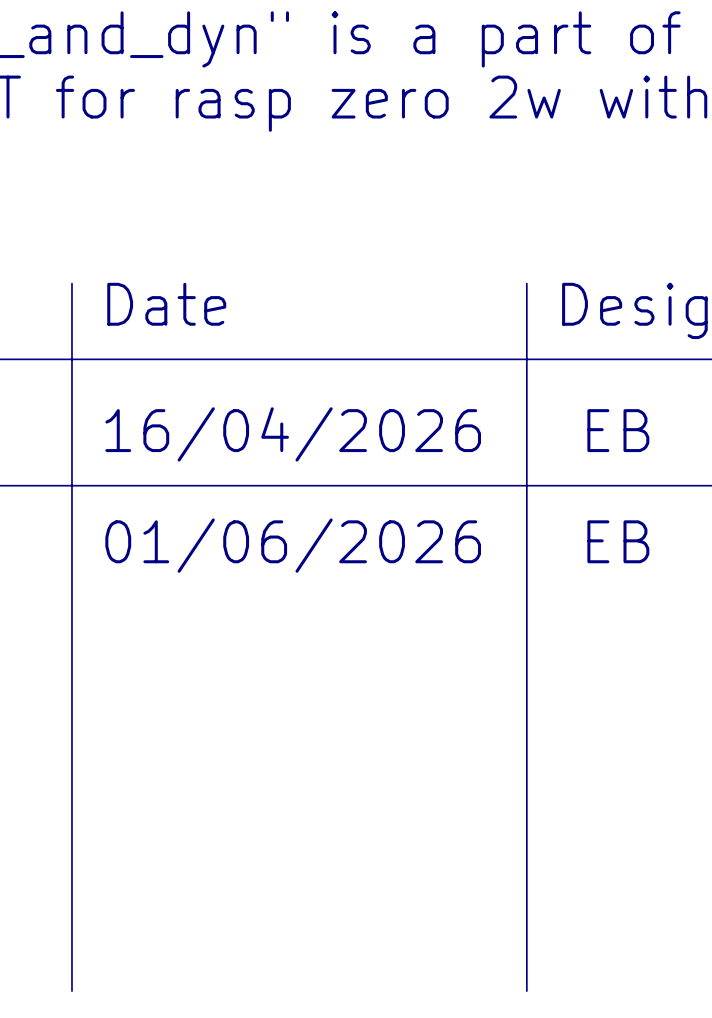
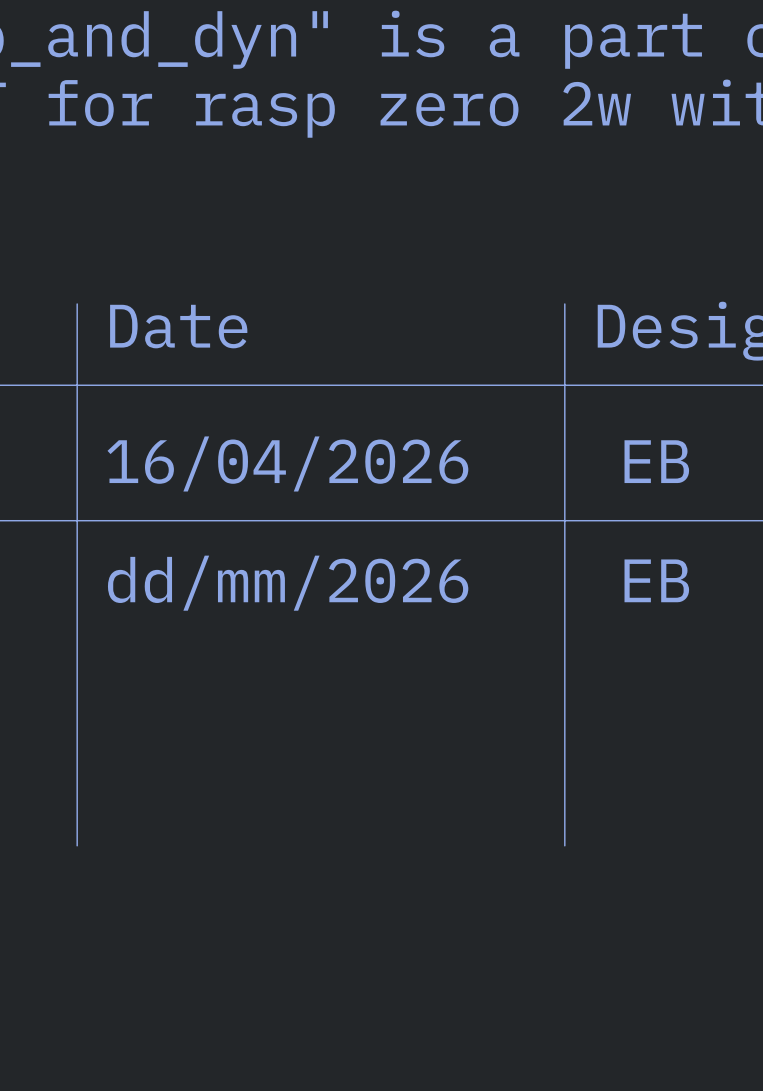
text: 01/06/2026 (293, 545) -> dd/mm/2026 (288, 583)
line: (71, 788) (71, 991) -> none
line: (526, 788) (526, 991) -> none

